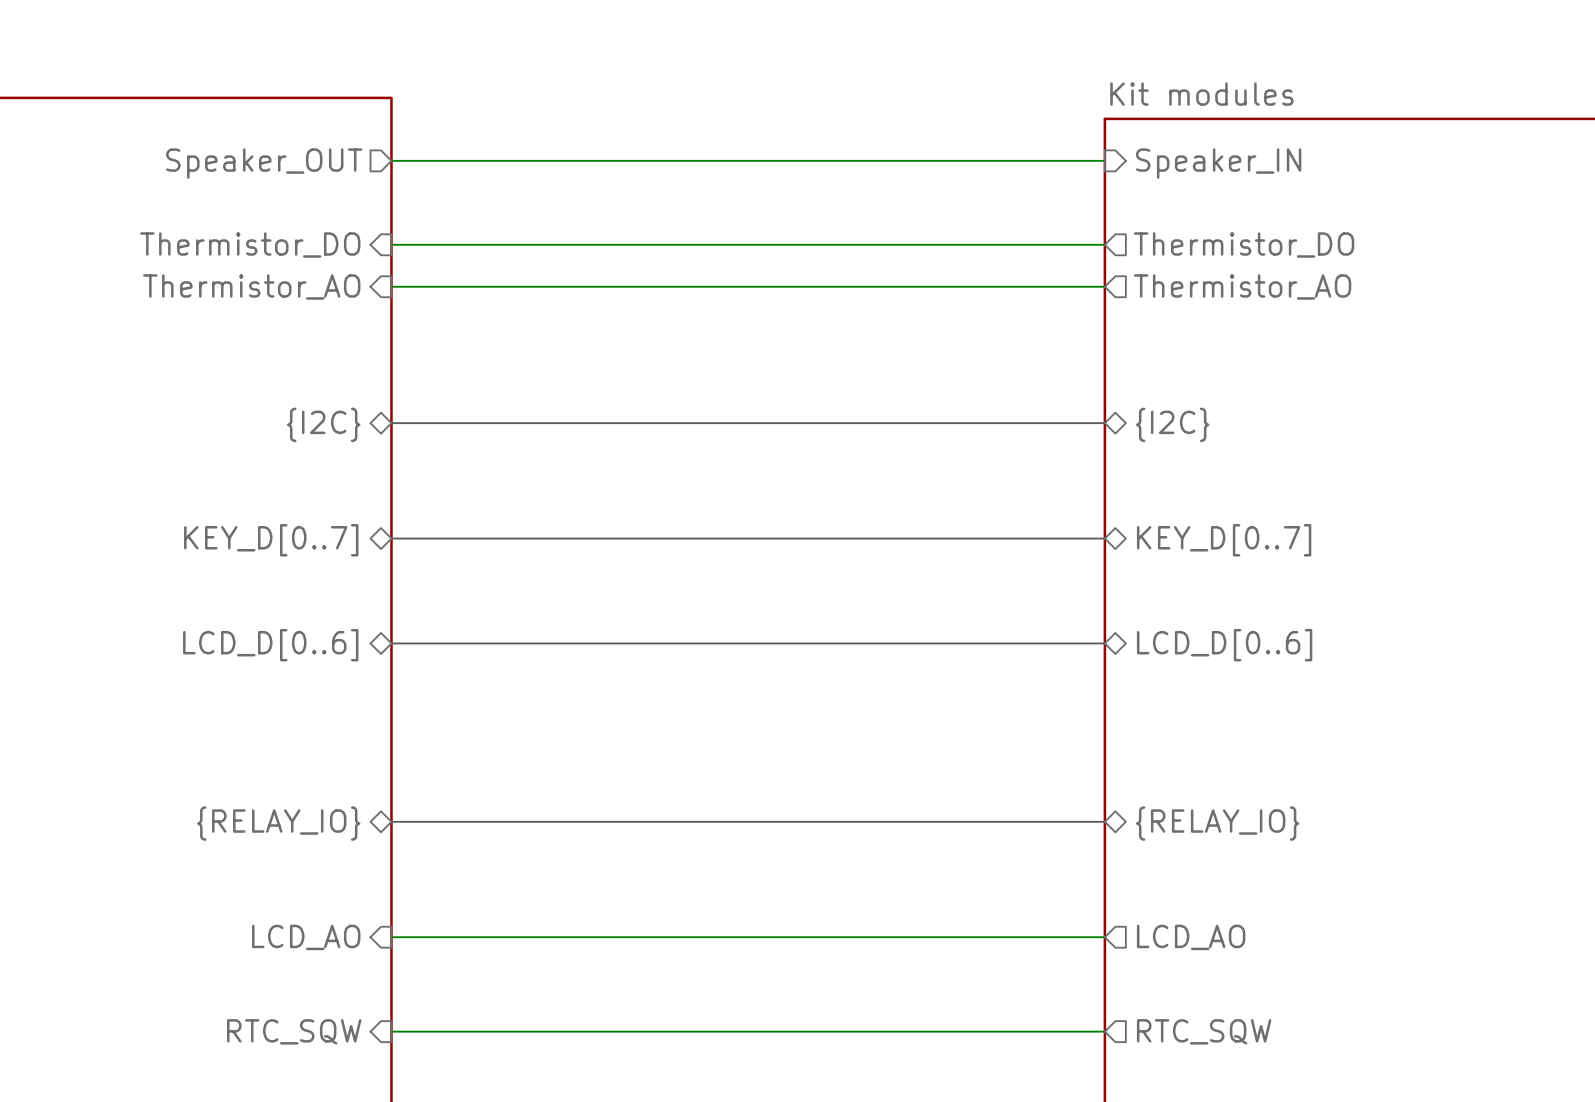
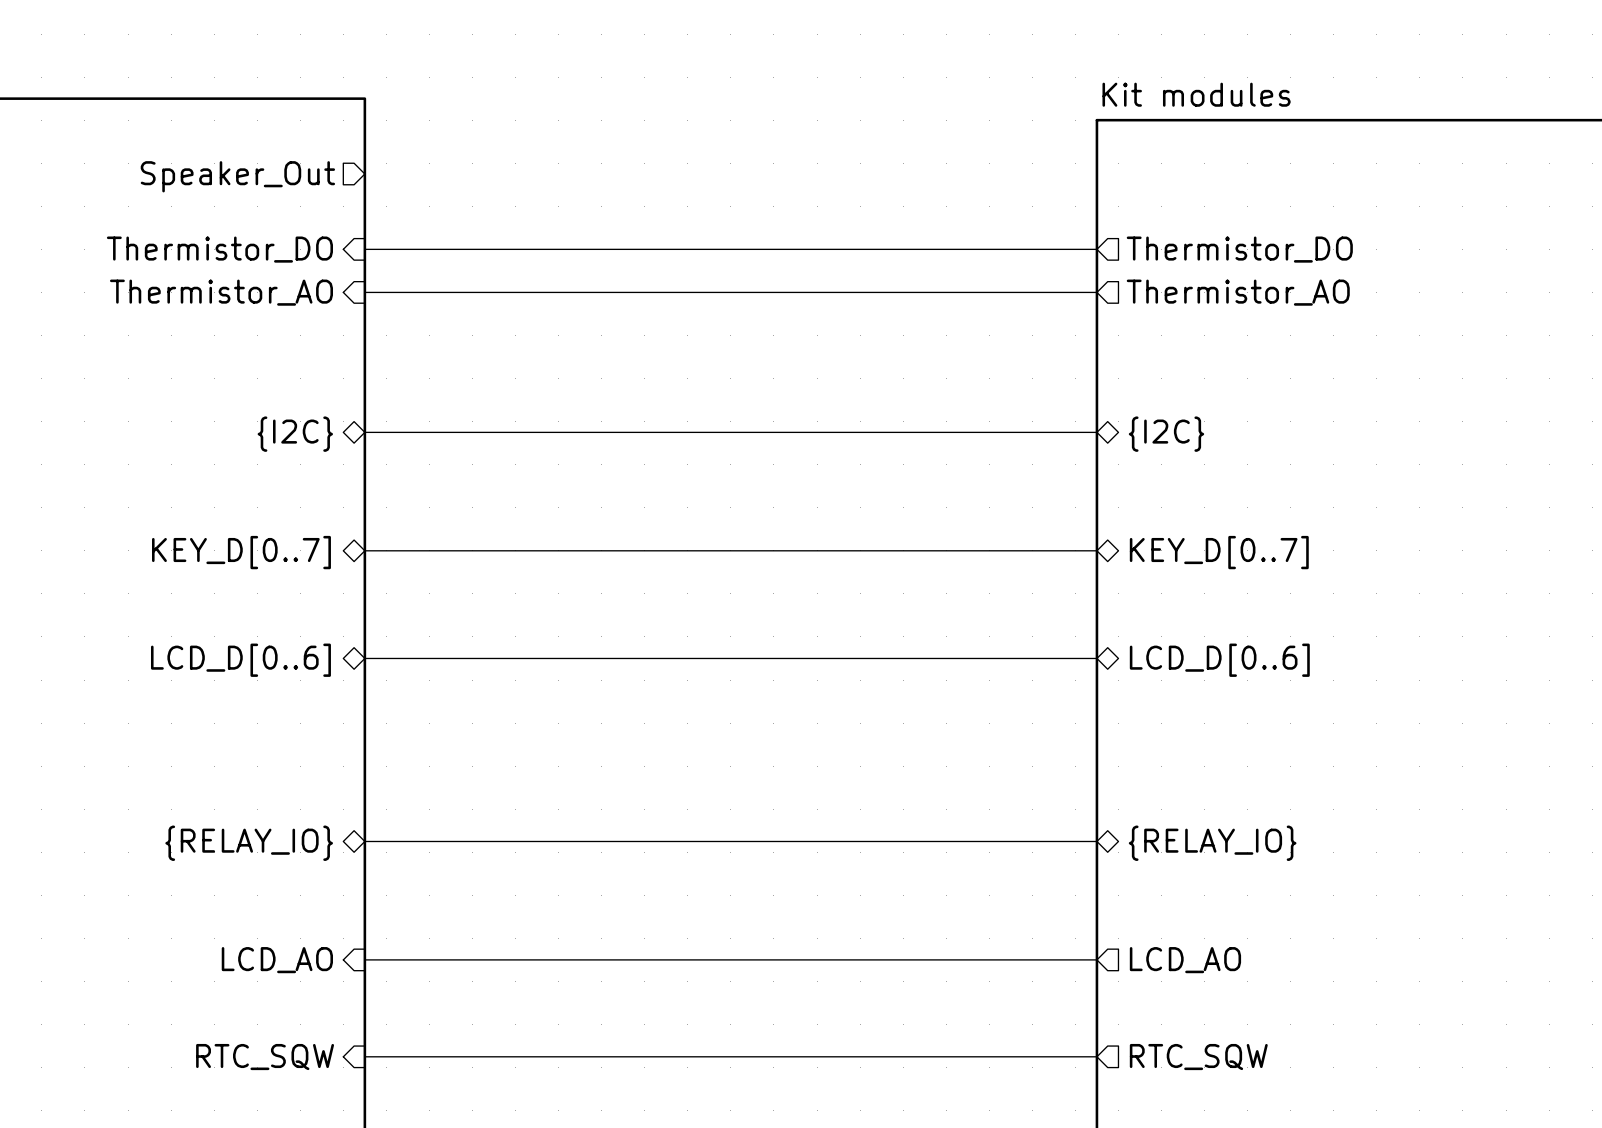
wire: (391, 160) (1104, 160) -> none
sheet pin: Speaker_OUT (264, 163) -> Speaker_Out (237, 176)
sheet pin: Speaker_IN (1218, 163) -> none

